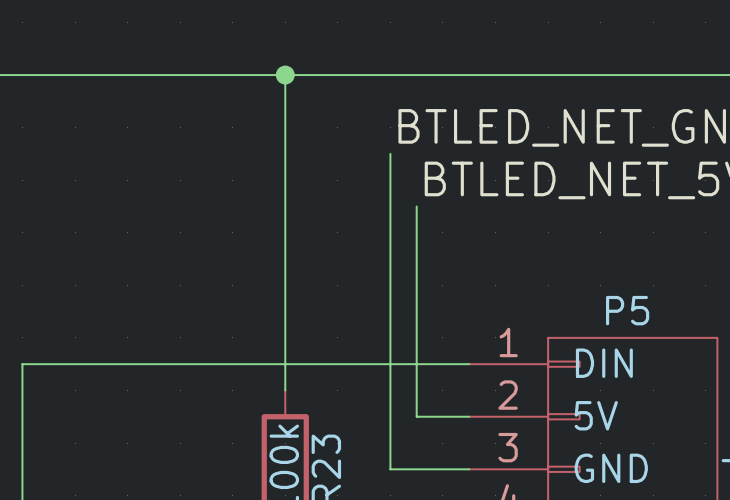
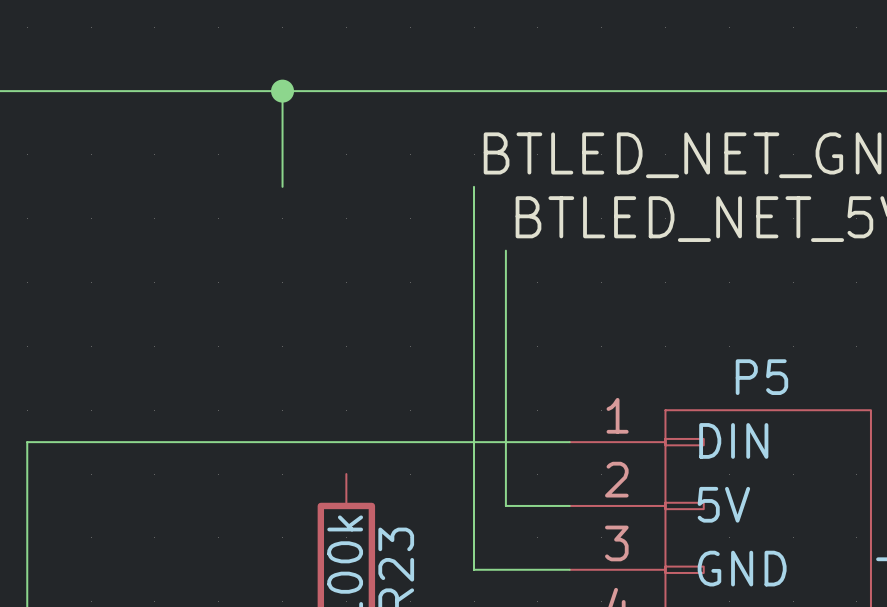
wire: none -> (282, 91) (282, 186)
wire: (285, 75) (285, 390) -> none
junction position: (285, 75) -> (282, 91)

